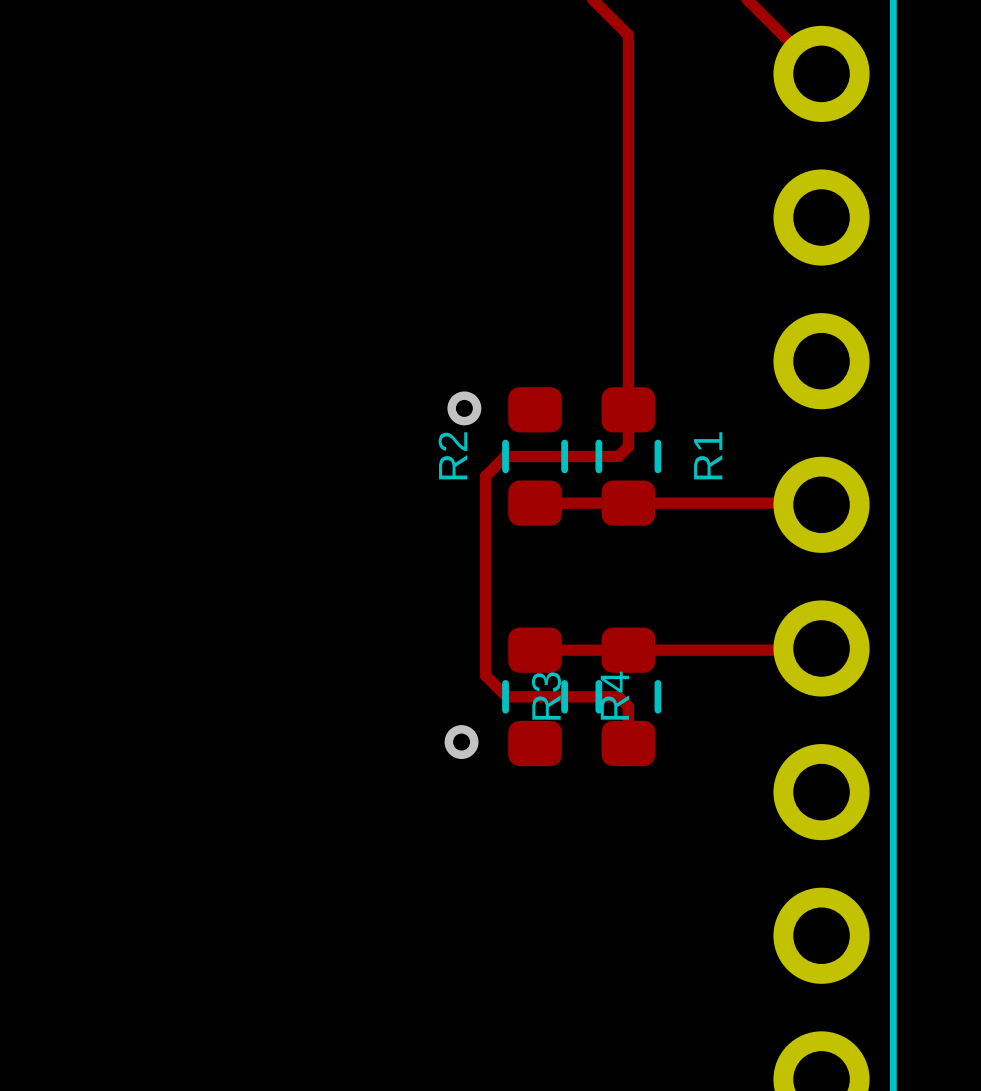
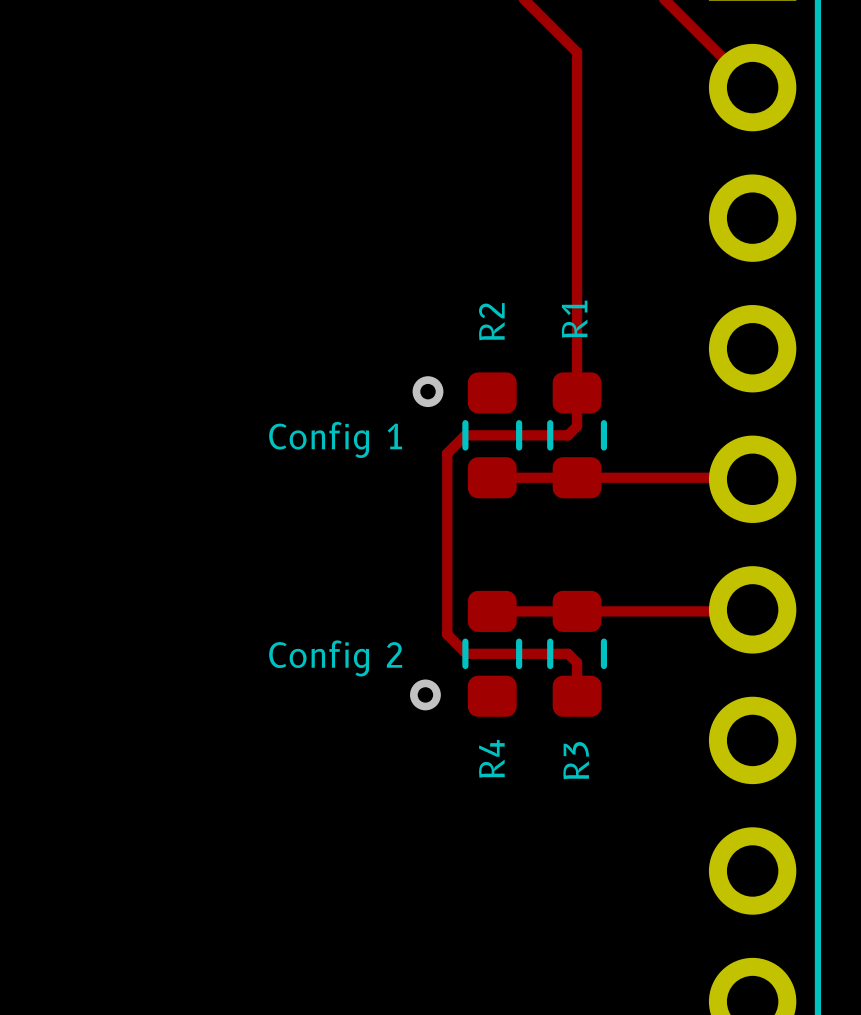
R2 name position: R2 (452, 455) -> R2 (491, 321)
R1 name position: R1 (708, 455) -> R1 (574, 319)
text: none -> Config 1 (335, 439)
R4 name position: R4 (614, 695) -> R4 (491, 758)
R3 name position: R3 (546, 696) -> R3 (576, 760)
text: none -> Config 2 (335, 658)

